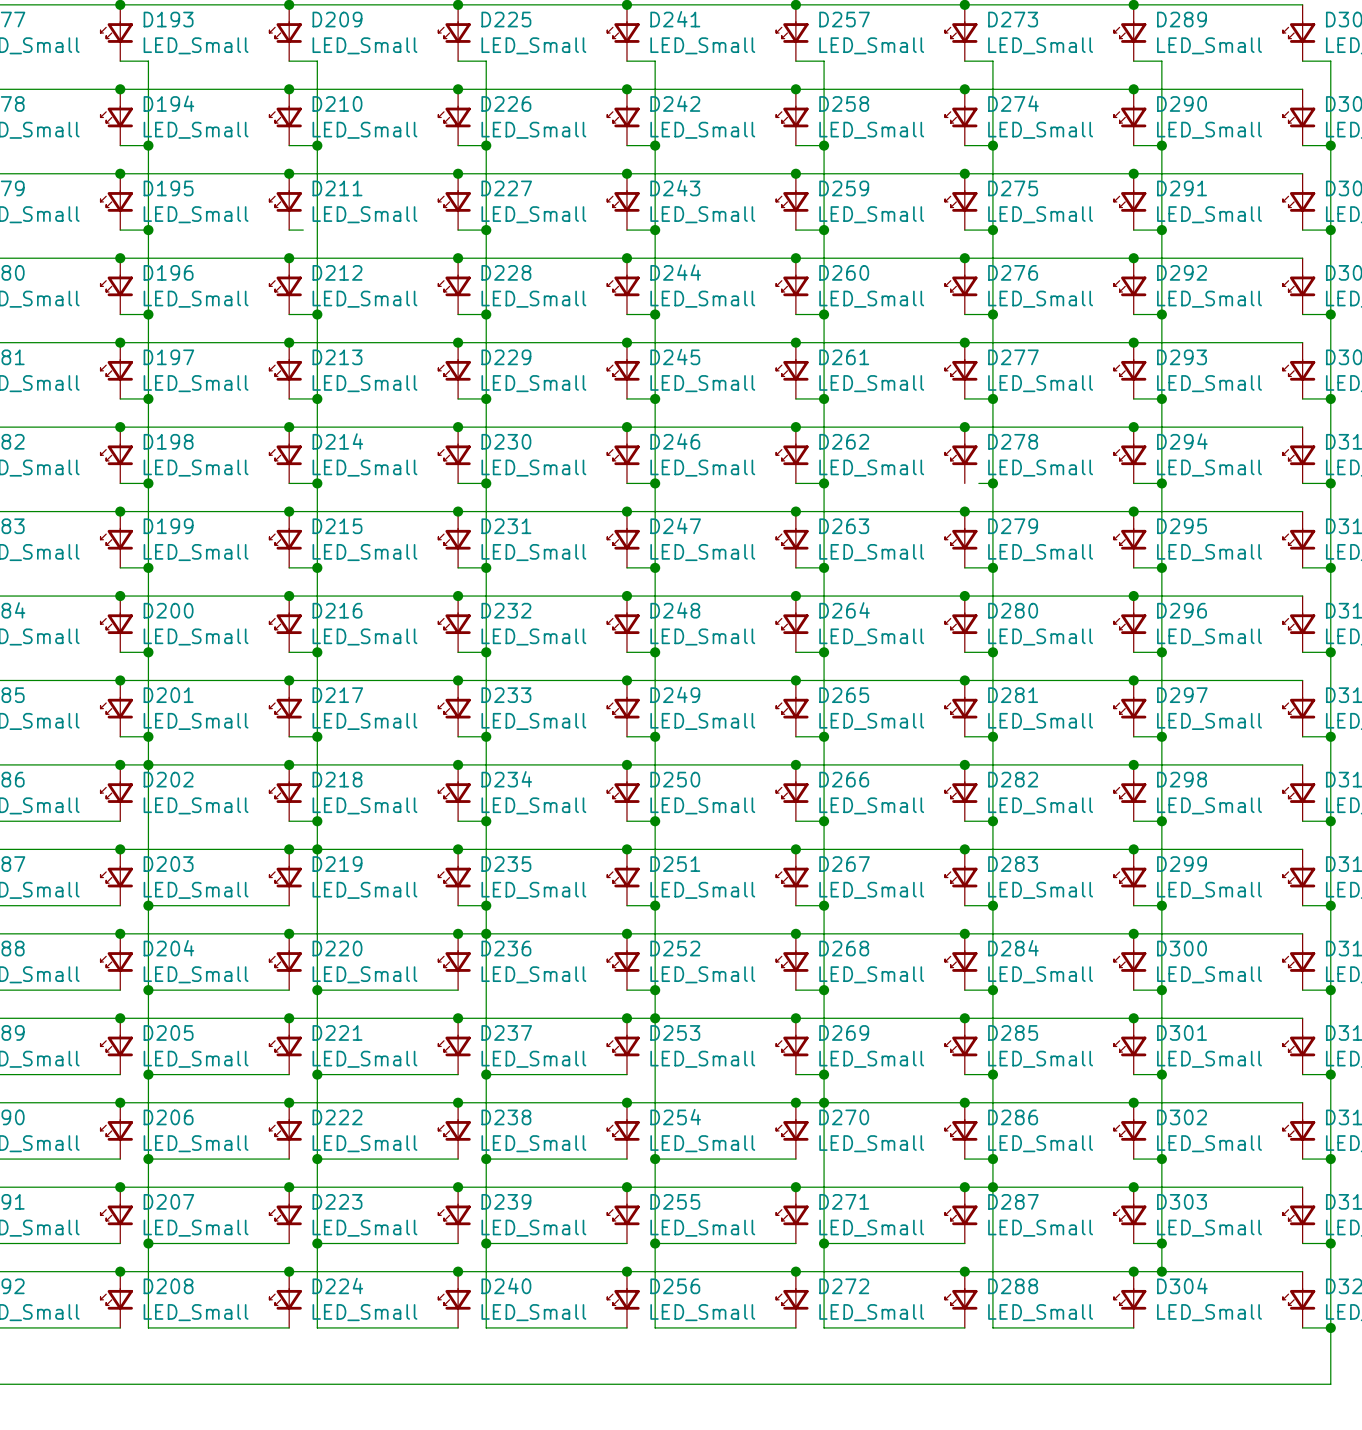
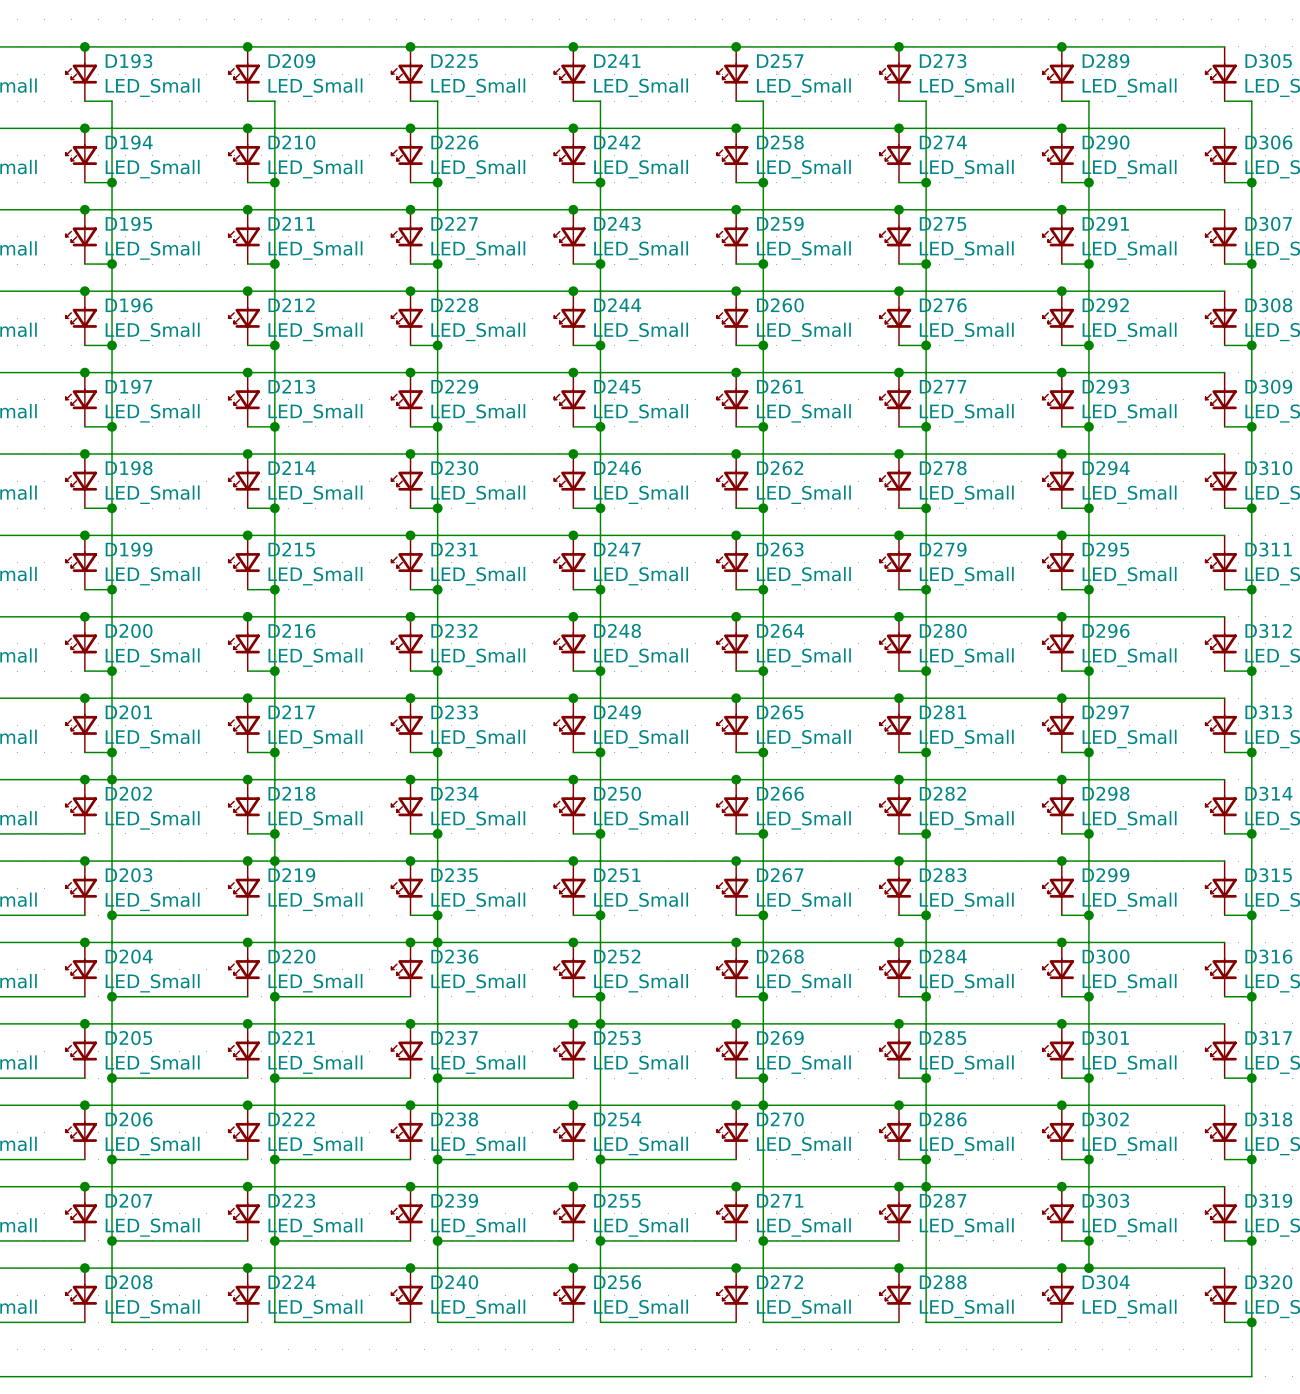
wire: none -> (261, 264) (274, 264)
junction: none -> (274, 264)
wire: none -> (898, 508) (912, 508)

